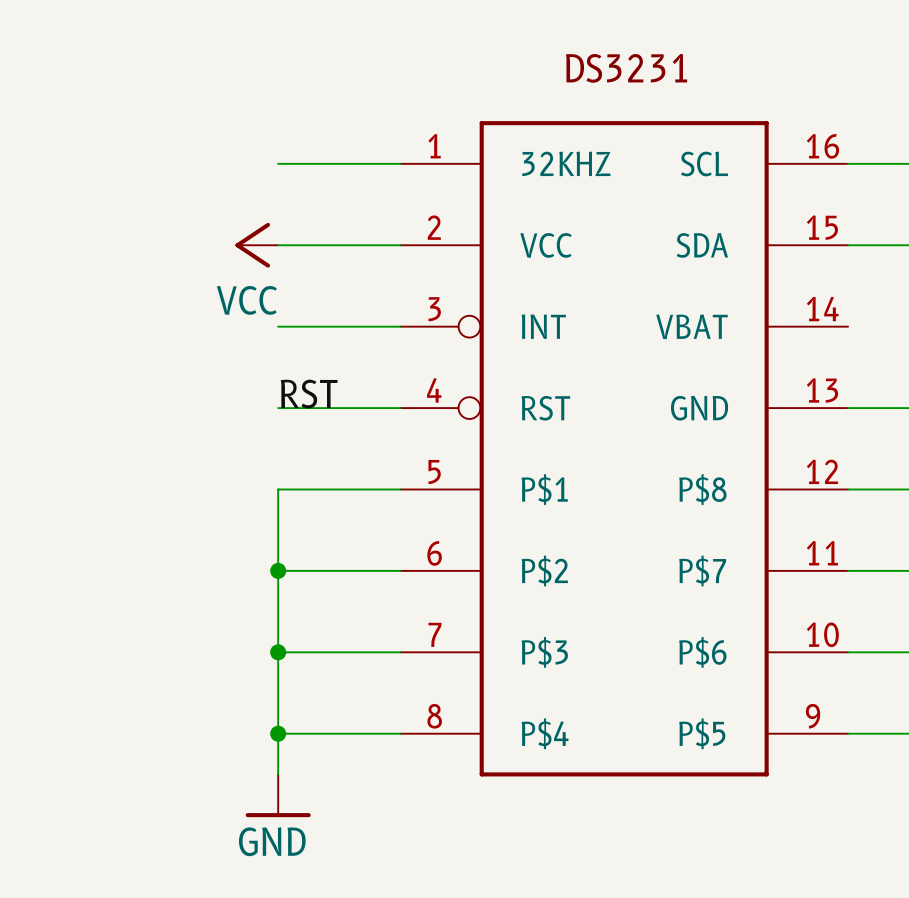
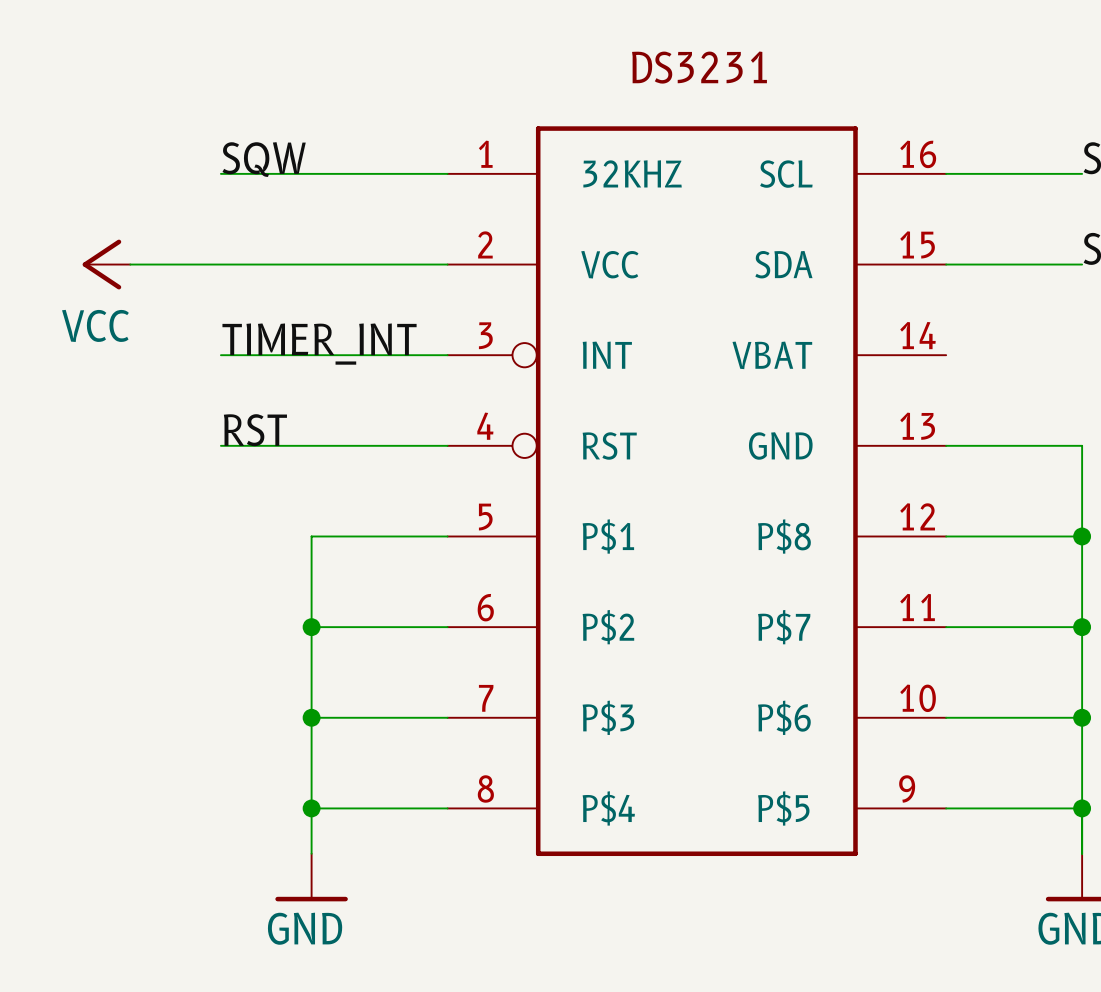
label: none -> SQW (264, 159)
wire: none -> (220, 173) (311, 173)
wire: none -> (130, 264) (311, 264)
power symbol position: VCC (256, 245) -> VCC (106, 264)
label: none -> TIMER_INT (319, 344)
wire: none -> (220, 355) (311, 355)
label position: RST (309, 394) -> RST (255, 430)
wire: none -> (220, 445) (311, 445)

